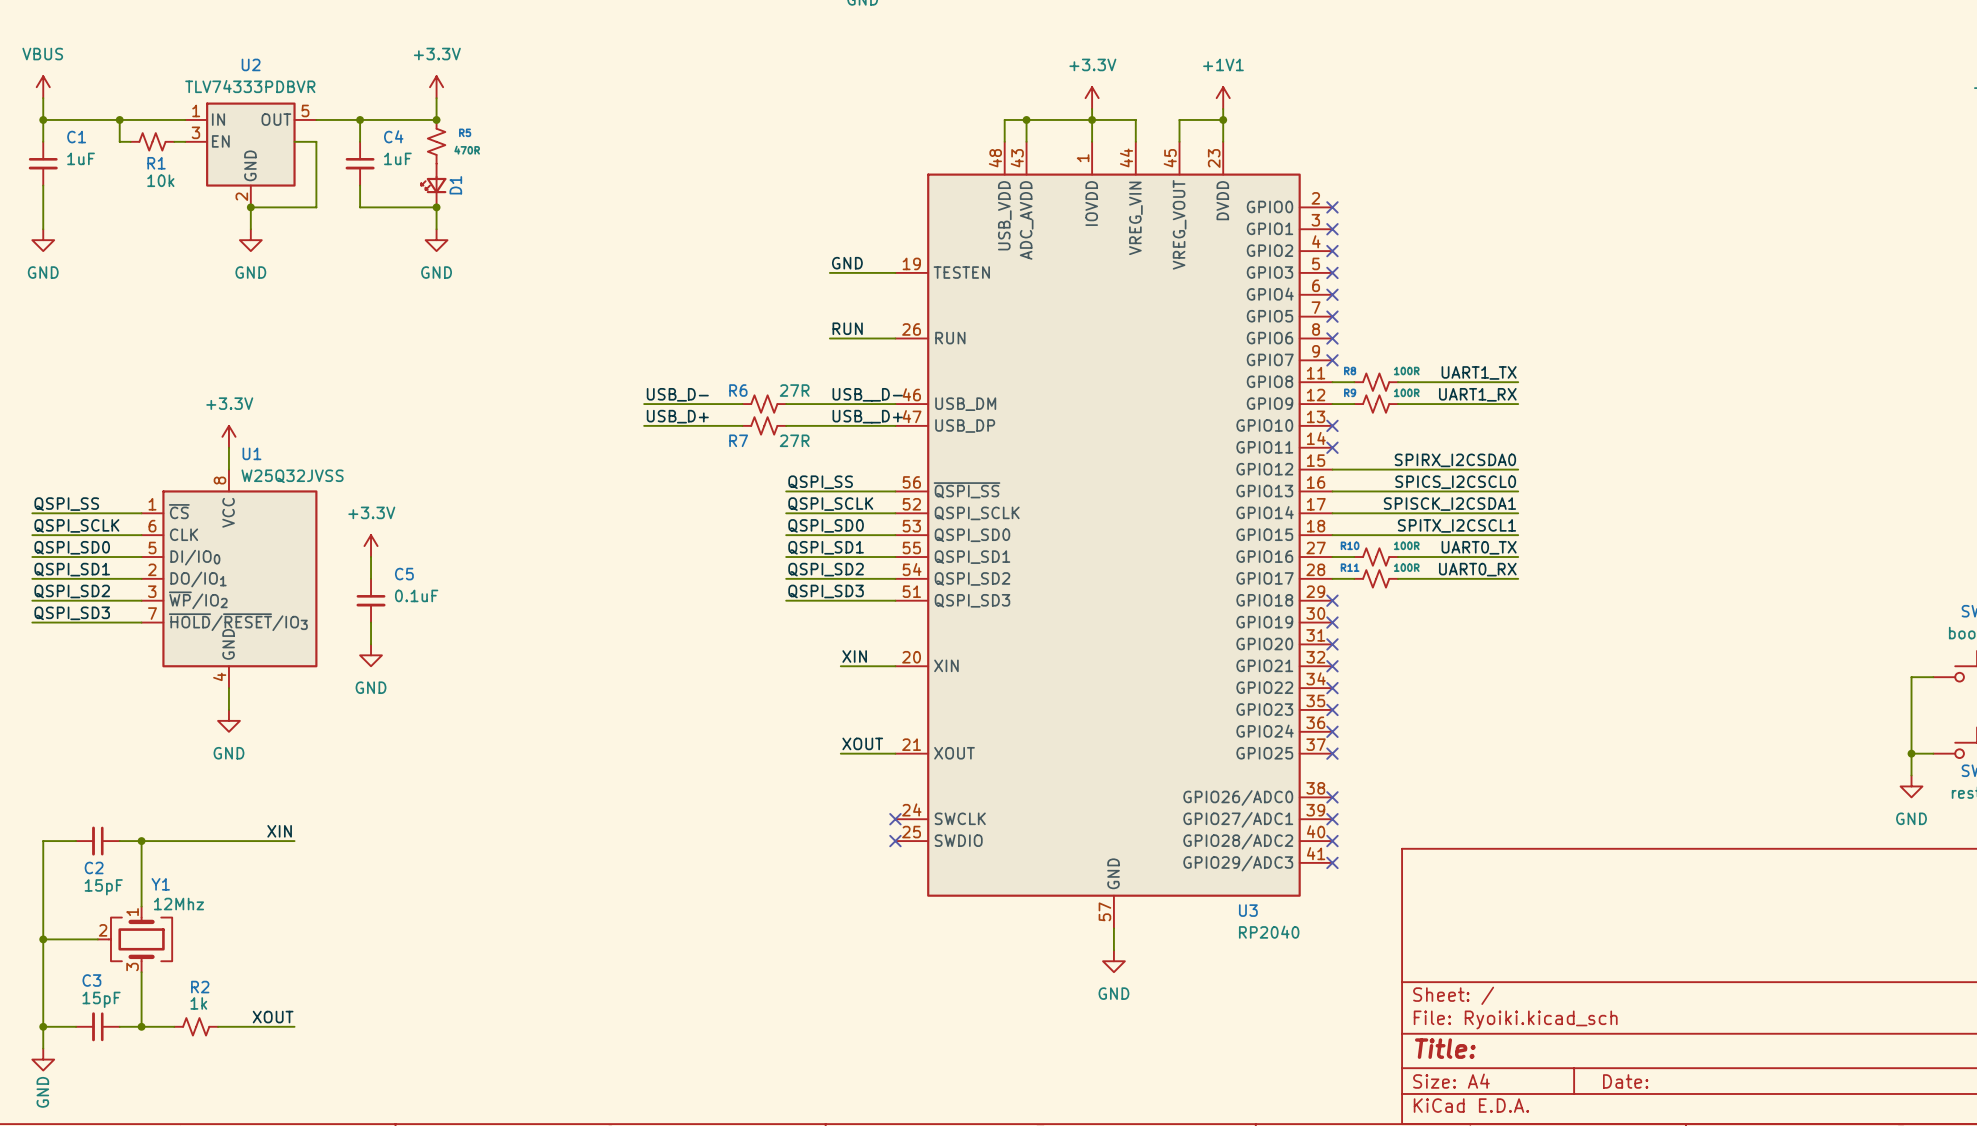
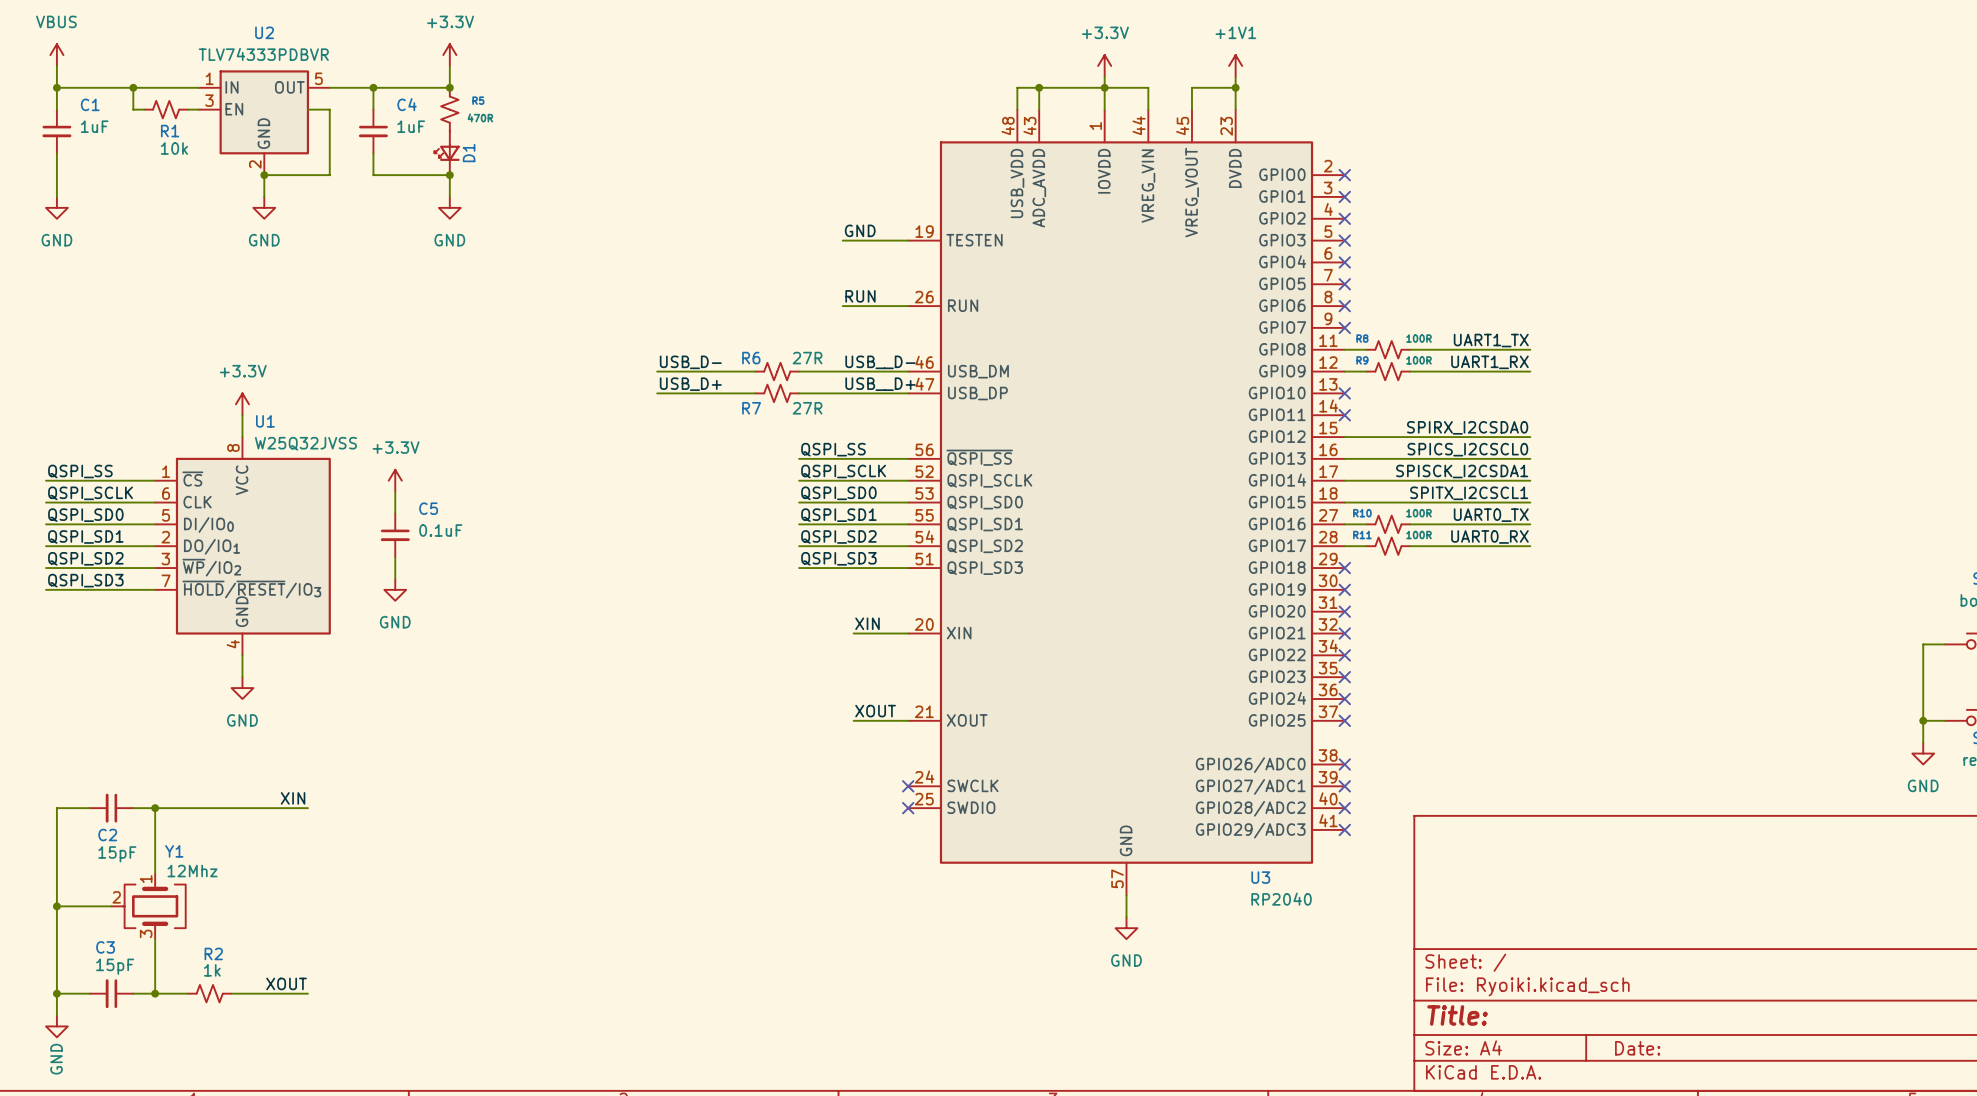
power symbol position: +3.3V (371, 546) -> +3.3V (395, 480)
wire: (371, 557) (371, 578) -> (395, 557) (395, 578)
C5 position: (371, 600) -> (395, 535)
wire: (371, 622) (371, 644) -> (395, 491) (395, 513)
power symbol position: GND (371, 655) -> GND (395, 589)

